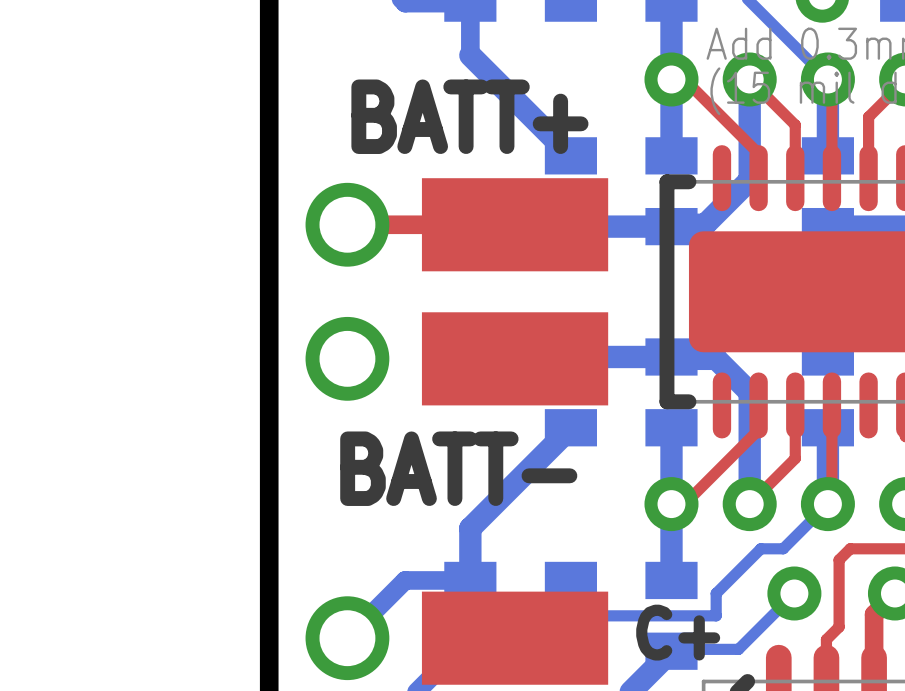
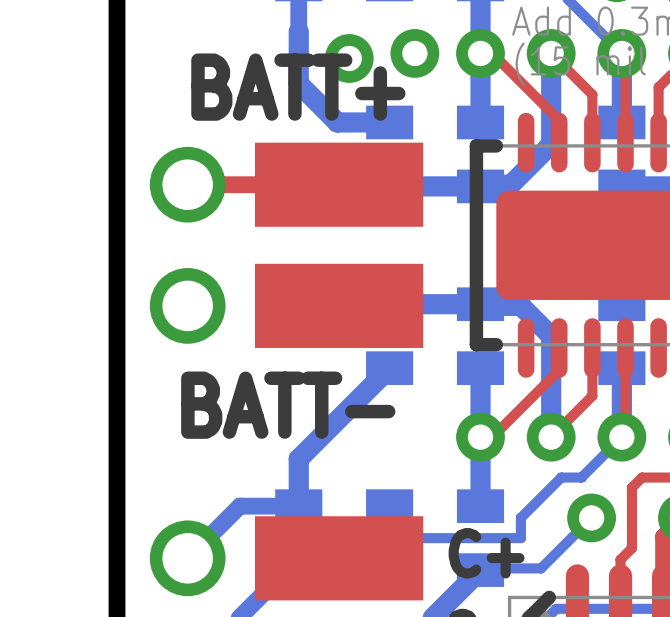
bottom track: (470, 55) (570, 155) -> (298, 31) (298, 83) (337, 122) (389, 122)
via: none -> (414, 53)
via: none -> (349, 58)

